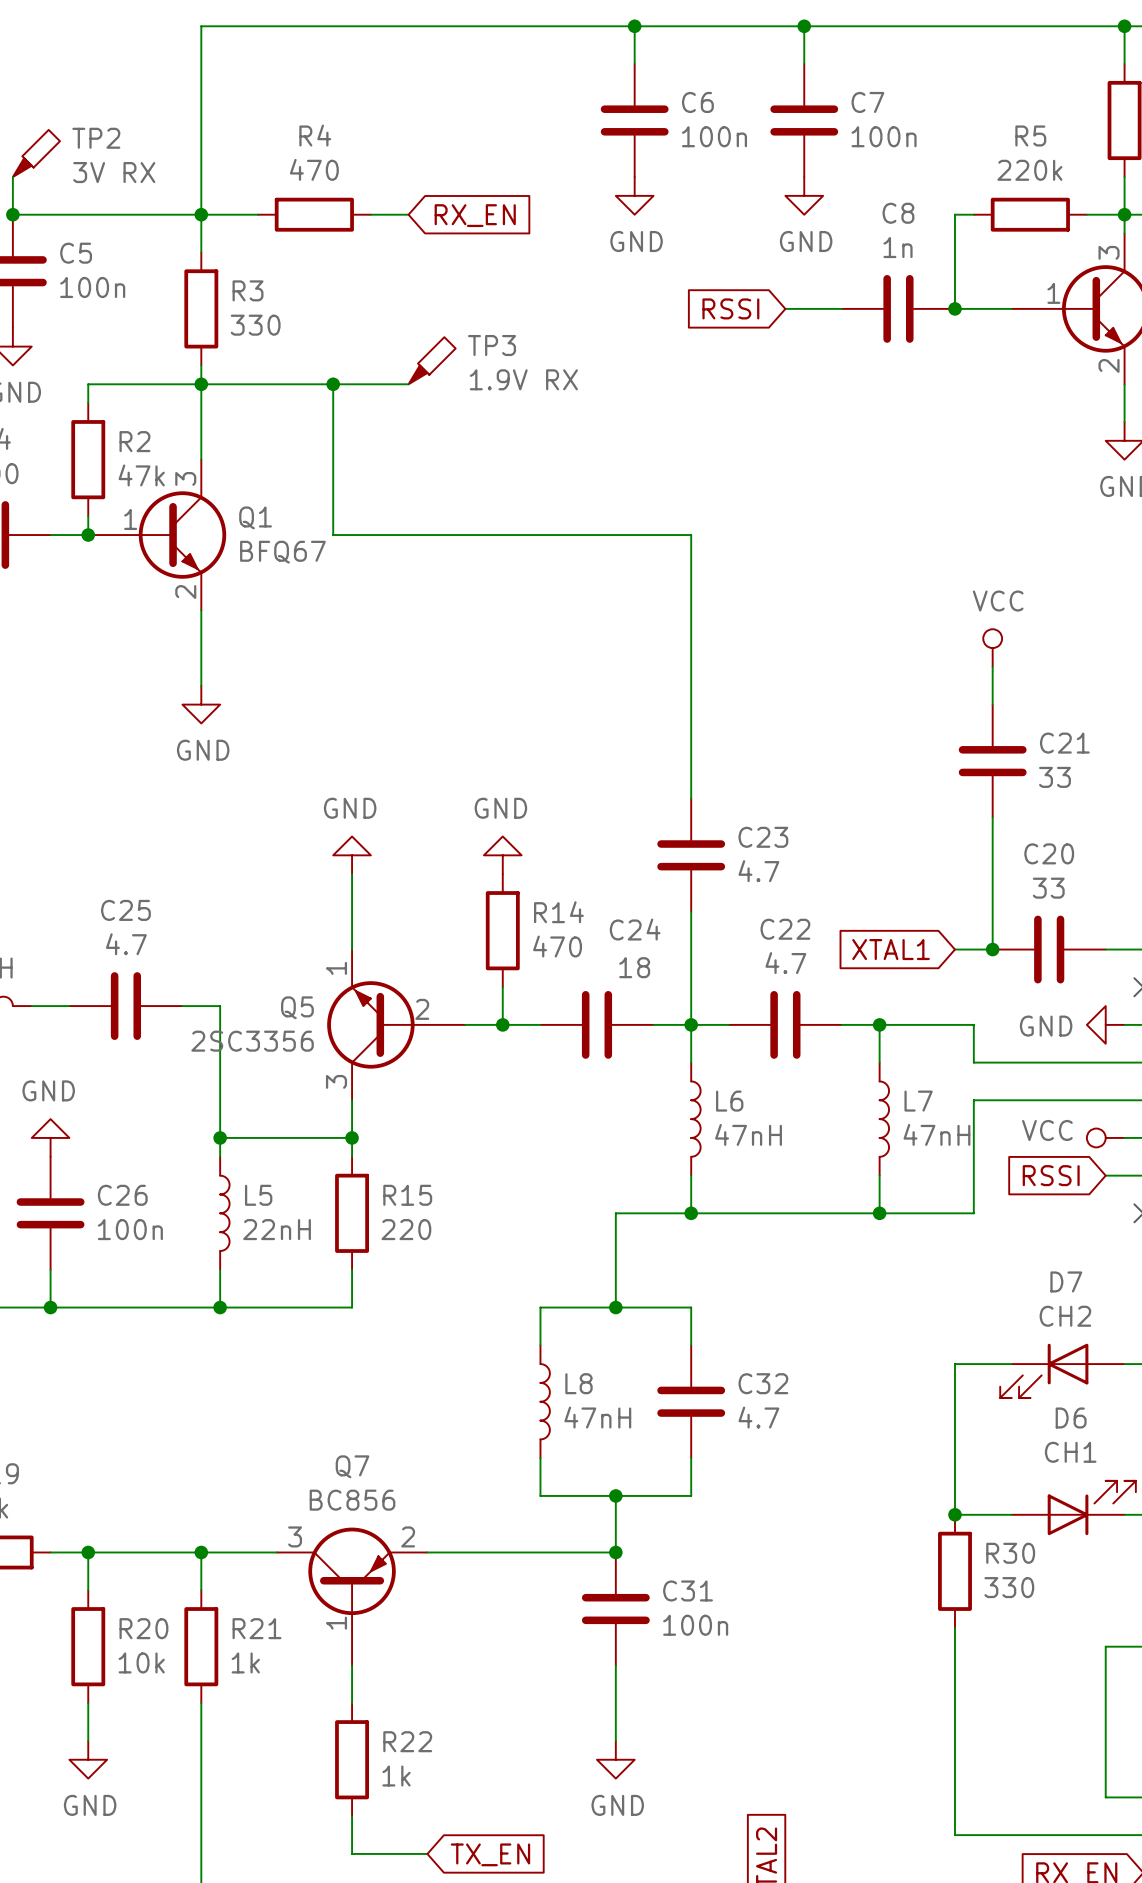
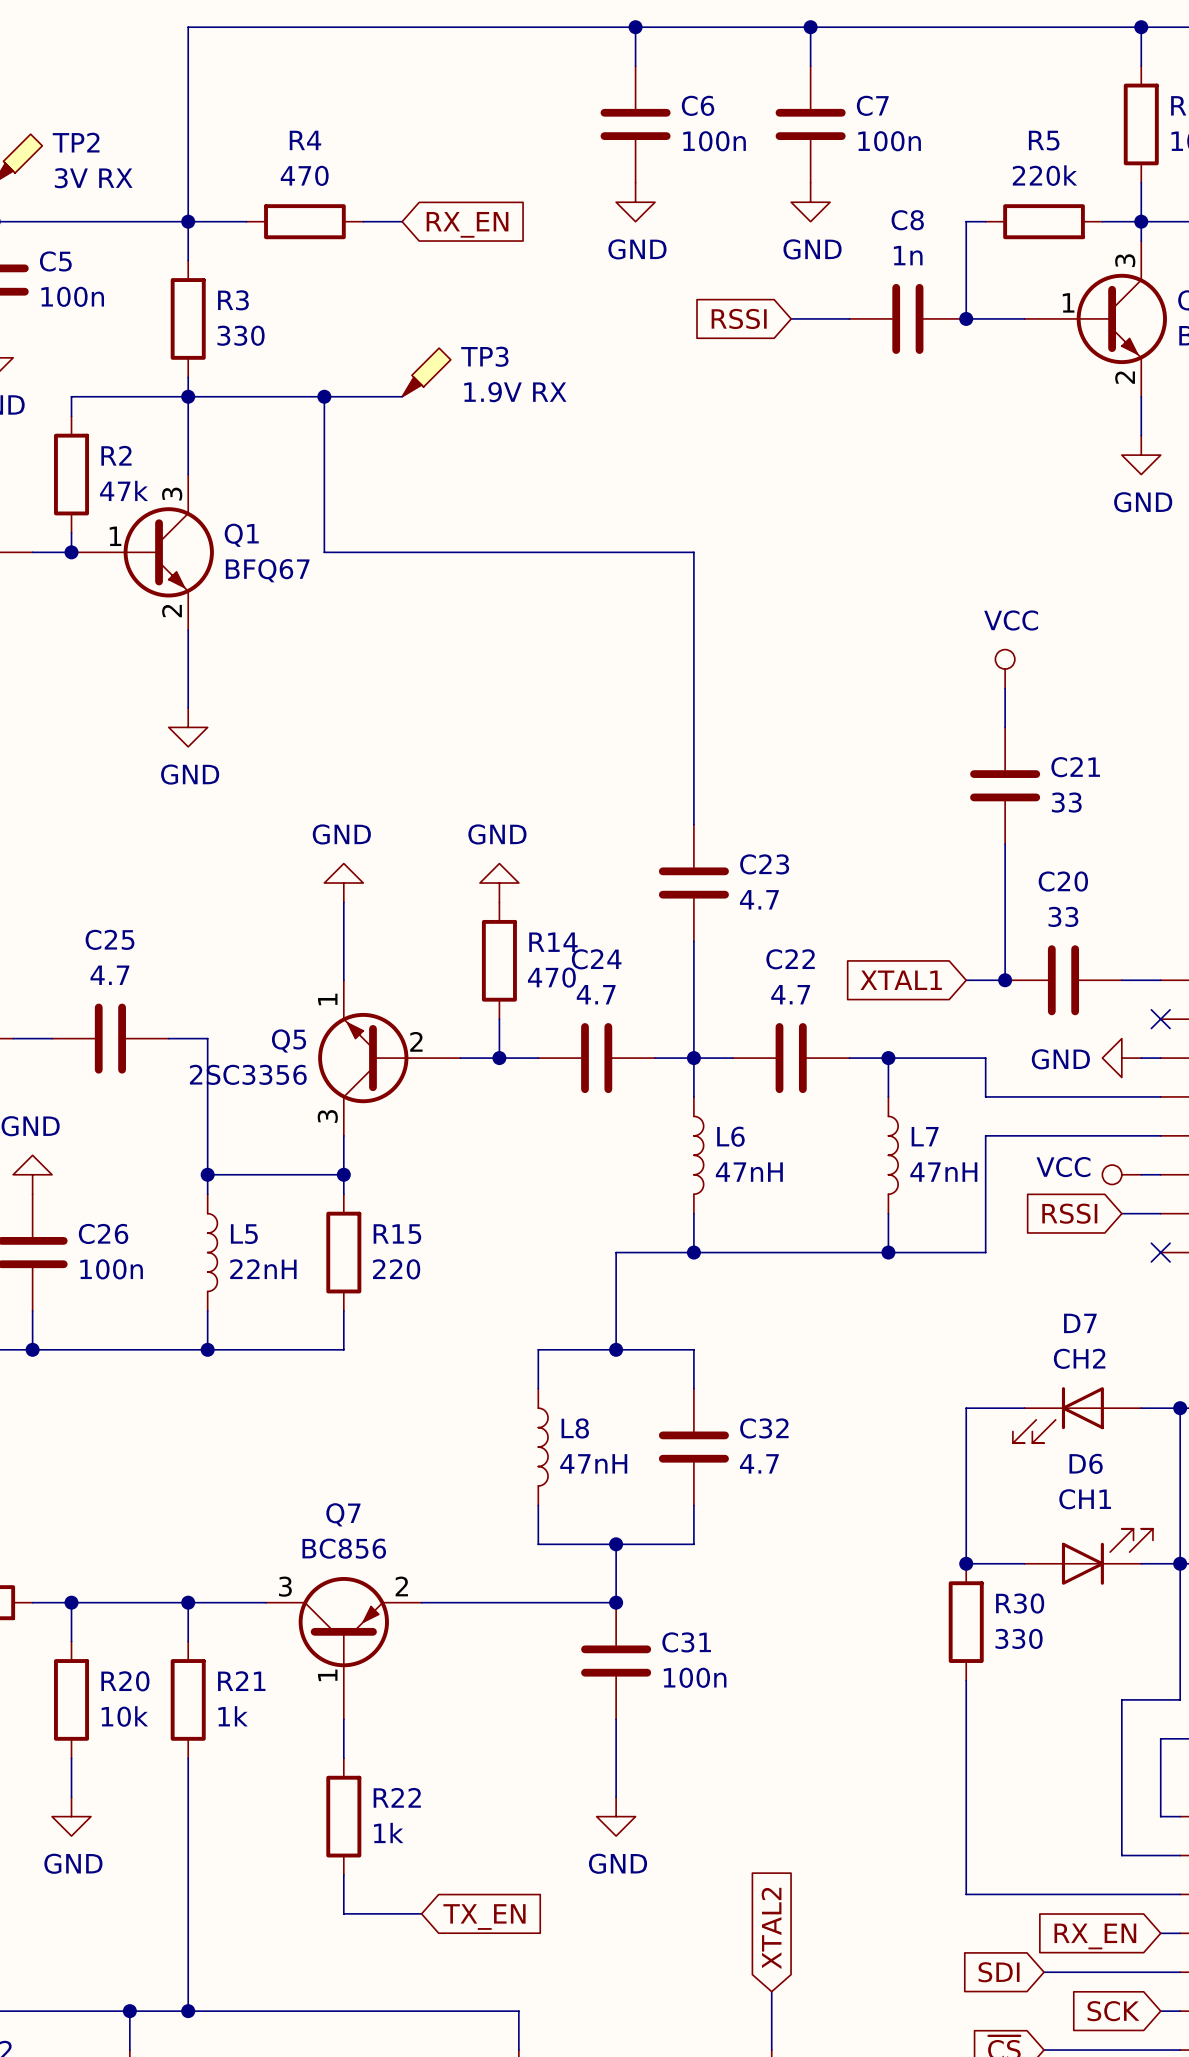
C24 name position: C24 (635, 929) -> C24 (596, 959)
C24 value: 18 (634, 967) -> 4.7 (596, 994)

